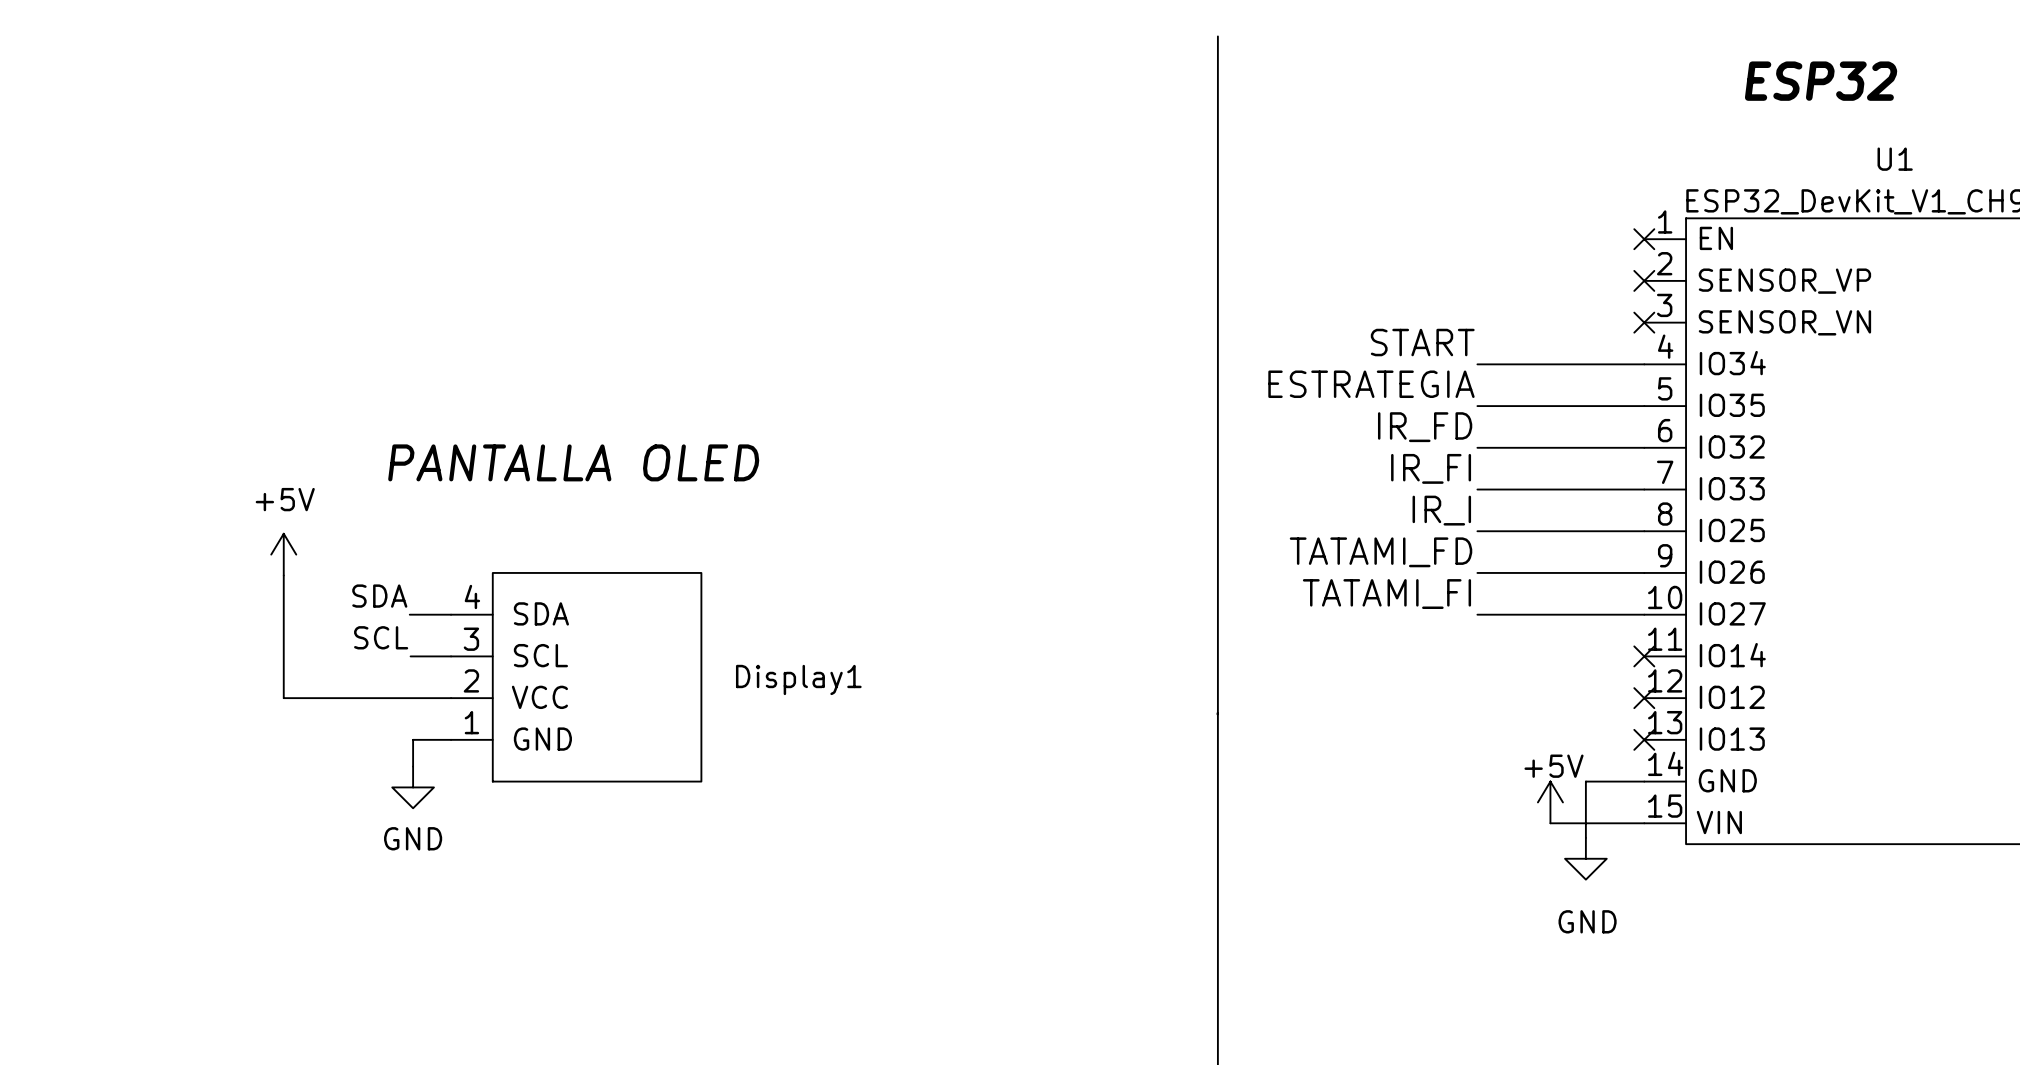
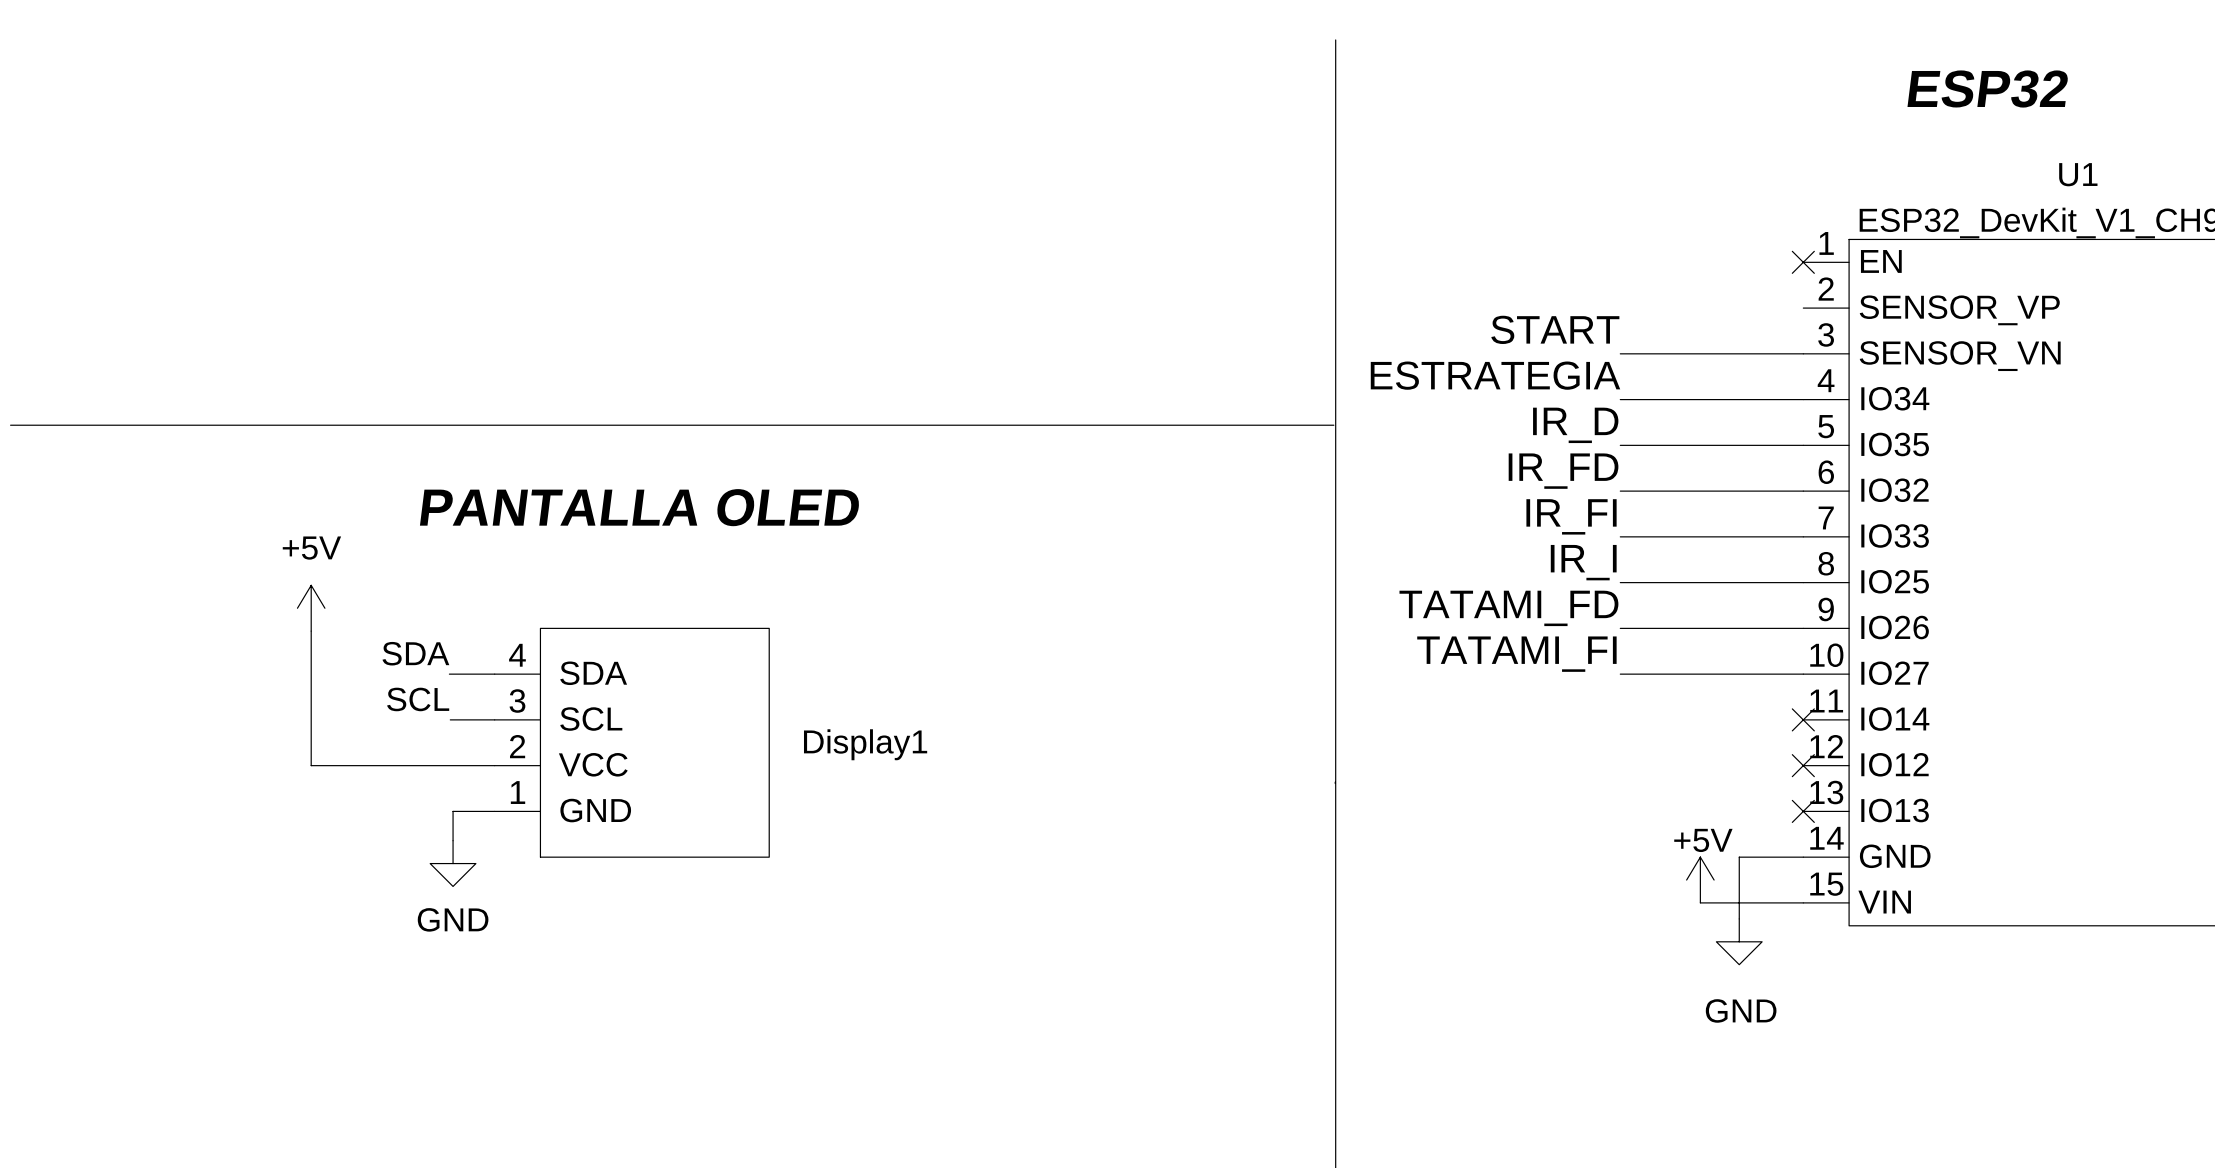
no-connect mark: (1644, 280) -> none
label: none -> START (1555, 329)
wire: none -> (1620, 353) (1803, 353)
no-connect mark: (1644, 322) -> none
label: START (1422, 342) -> ESTRATEGIA (1495, 375)
label: ESTRATEGIA (1371, 384) -> IR_D (1575, 425)
line: none -> (10, 425) (1333, 425)

